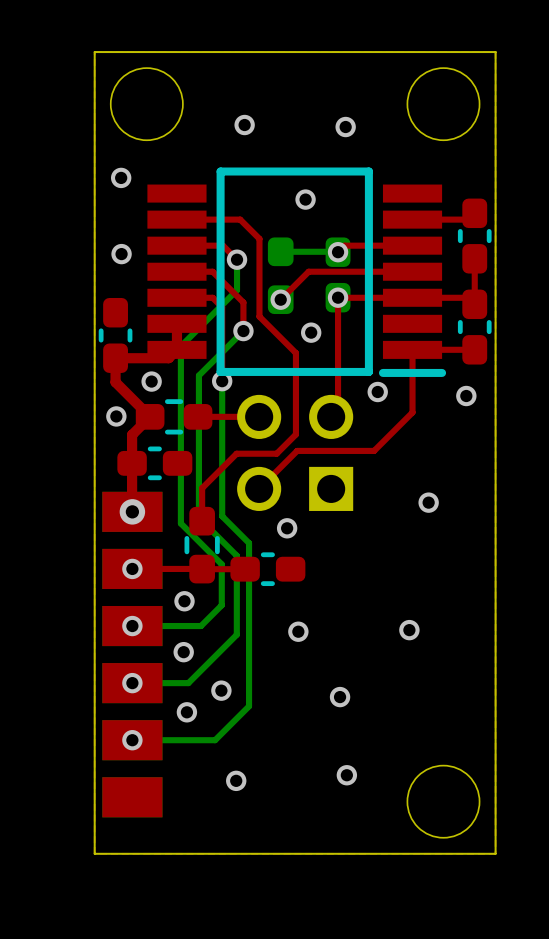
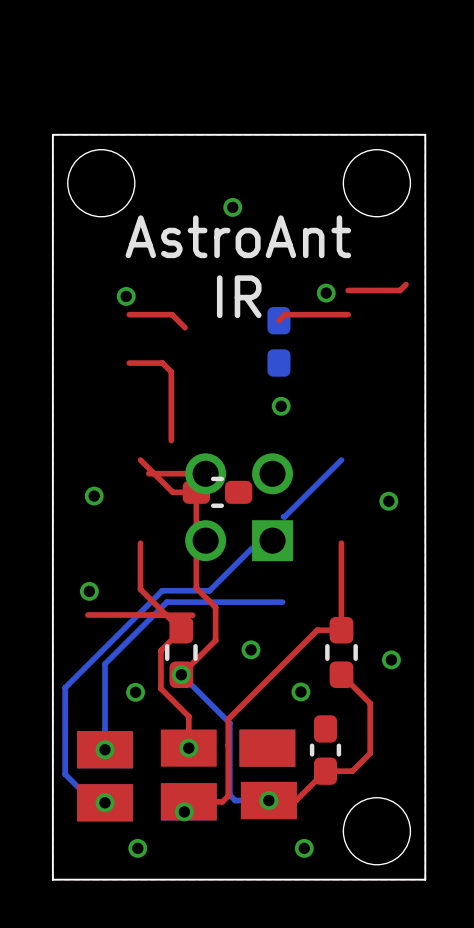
via: (244, 125) -> none
via: (345, 127) -> none
via: none -> (232, 207)
text: none -> AstroAnt (238, 236)
via: (121, 177) -> none
via: (305, 199) -> none
top track: (176, 219) (240, 219) (259, 238) (259, 316) (295, 353) (295, 434) (276, 453) (236, 453) (202, 488) (202, 521) -> none
via: none -> (326, 293)
via: none -> (126, 296)
text: none -> IR (239, 296)
part: (474, 236) -> none
bottom track: (280, 251) (337, 251) -> none
via: (338, 252) -> none
via: (121, 254) -> none
top track: (474, 258) (474, 304) (468, 297) (338, 297) (338, 410) (331, 416) -> none
bottom track: (237, 259) (237, 290) (180, 346) (180, 523) (221, 564) (221, 605) (201, 626) (132, 626) -> none
via: (237, 259) -> none
top track: (176, 271) (212, 271) (243, 302) (243, 331) -> none
top track: (412, 271) (308, 271) (280, 299) -> none
part: (296, 272) -> none
part: (280, 275) -> none
via: (338, 297) -> none
via: (280, 299) -> none
top track: (176, 323) (176, 349) (168, 358) (115, 358) (115, 382) (150, 416) (132, 434) (132, 511) -> none
part: (474, 327) -> none
bottom track: (243, 331) (198, 375) (198, 517) (236, 555) (236, 634) (188, 683) (132, 683) -> none
via: (243, 331) -> none
via: (311, 332) -> none
part: (115, 335) -> none
via: none -> (281, 406)
top track: (474, 349) (412, 349) (412, 412) (374, 450) (297, 450) (259, 488) -> none
via: (151, 381) -> none
bottom track: (222, 381) (222, 516) (249, 543) (249, 706) (215, 740) (132, 740) -> none
via: (222, 381) -> none
via: (377, 391) -> none
via: (466, 396) -> none
top track: none -> (140, 460) (172, 492) (196, 492) (196, 588) (215, 607) (215, 640) (181, 674)
bottom track: none -> (341, 460) (283, 516)
via: (116, 416) -> none
part: (174, 416) -> none
part: none -> (217, 492)
via: none -> (94, 496)
via: none -> (388, 501)
part: (154, 463) -> none
top track: none -> (140, 543) (140, 589) (181, 630) (160, 650) (160, 688) (188, 716) (188, 748)
top track: none -> (341, 543) (341, 630) (317, 630) (228, 719) (228, 795) (222, 801) (188, 801)
bottom track: none -> (252, 548) (209, 590) (162, 590) (65, 687) (65, 774) (93, 802) (105, 802)
via: (428, 502) -> none
part: (132, 511) -> none
via: (132, 511) -> none
via: (287, 528) -> none
part position: (202, 545) -> (181, 652)
bottom track: none -> (282, 602) (166, 602) (105, 664) (105, 749)
part: (132, 568) -> none
via position: (132, 568) -> (89, 591)
part: (267, 569) -> none
via: (184, 601) -> none
part: none -> (341, 652)
via: none -> (391, 659)
part: (132, 626) -> none
via: (132, 626) -> none
via: (409, 630) -> none
via position: (298, 631) -> (251, 649)
bottom track: none -> (181, 674) (229, 723) (229, 795) (235, 800) (268, 800)
via: none -> (181, 674)
top track: none -> (341, 674) (370, 703) (370, 753) (352, 771) (325, 771) (296, 800) (268, 800)
via: none -> (300, 691)
part: (132, 683) -> none
via: (132, 683) -> none
via: (221, 690) -> none
via: (340, 697) -> none
via: (186, 712) -> none
part: none -> (188, 748)
via: none -> (188, 748)
part: none -> (267, 748)
part: none -> (105, 749)
via: none -> (105, 749)
part: none -> (325, 750)
part: (132, 740) -> none
via: (132, 740) -> none
part: none -> (268, 800)
part: none -> (188, 801)
part: none -> (105, 802)
via: none -> (105, 802)
via position: (346, 775) -> (268, 800)
part: (132, 797) -> none
via: none -> (137, 848)
via: none -> (304, 848)

